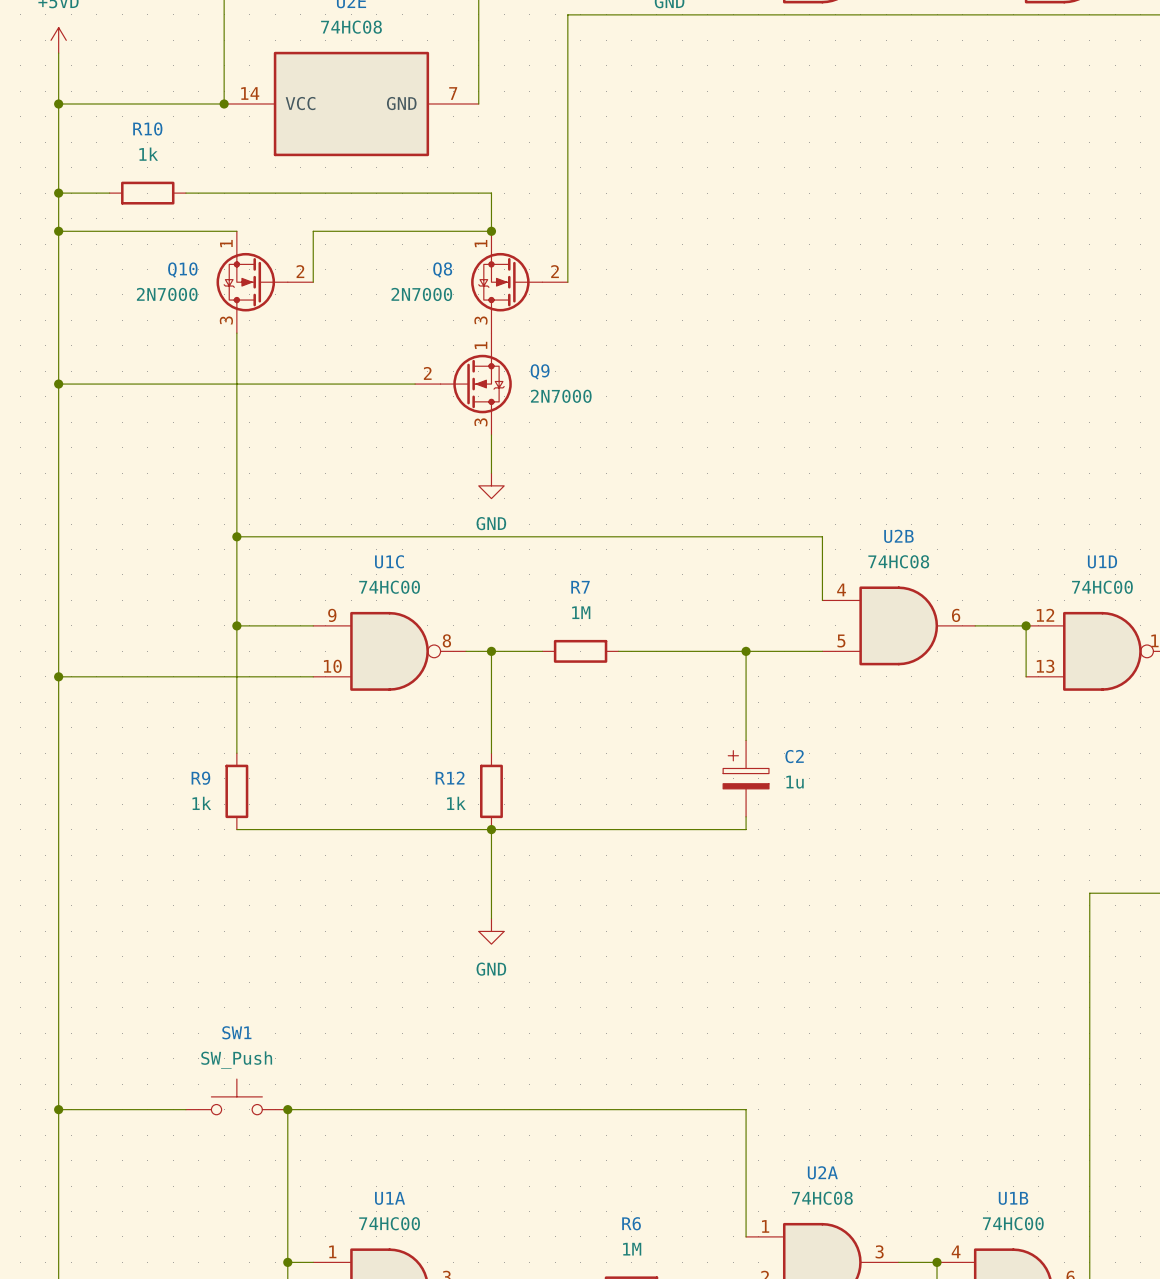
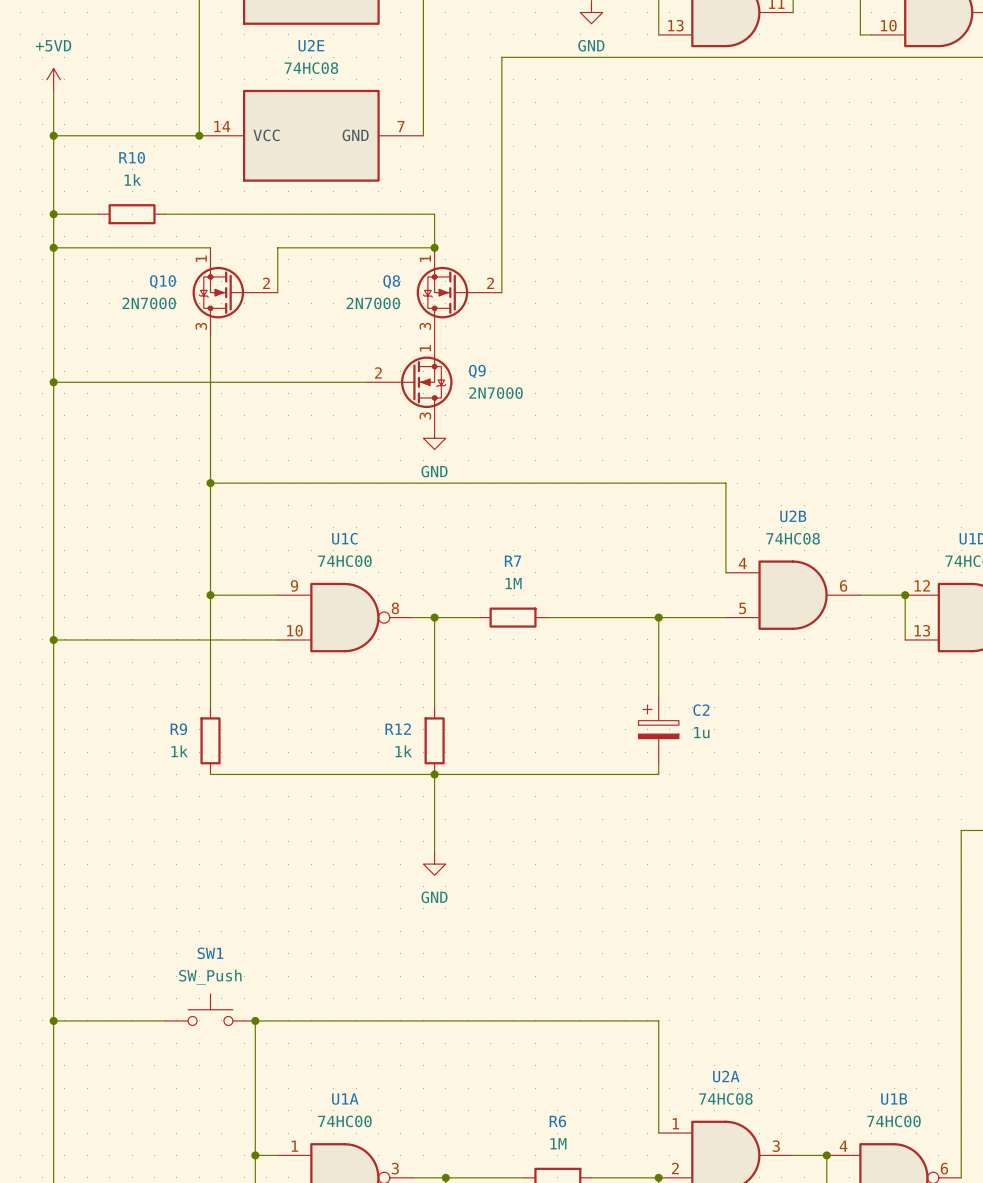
wire: (491, 434) (491, 473) -> none
power symbol position: GND (491, 485) -> GND (434, 438)
wire: (236, 536) (822, 536) -> (210, 483) (725, 483) (725, 516)
junction position: (236, 536) -> (210, 483)

